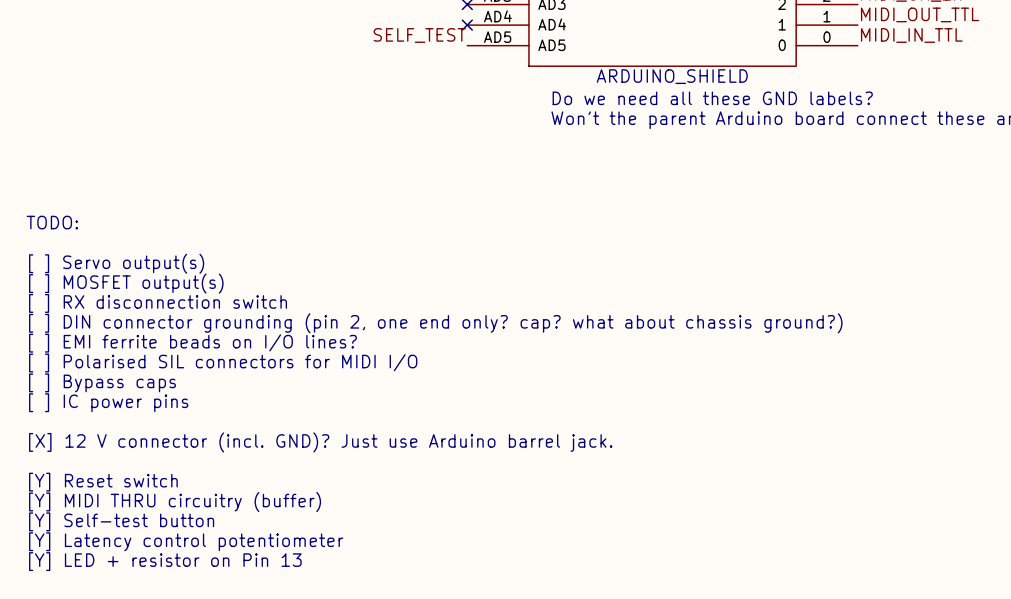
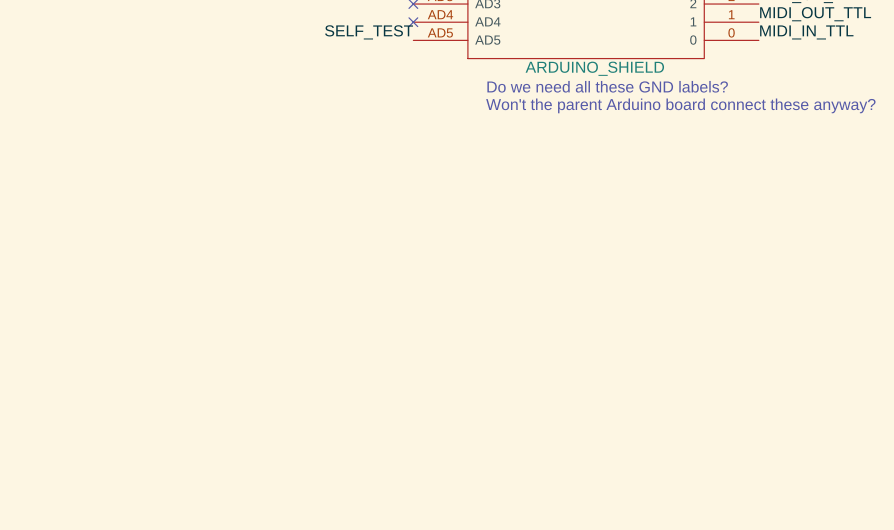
text: TODO: (52, 222) -> none
text: [ ] Servo output(s) (116, 263) -> none
text: [ ] MOSFET output(s) (126, 283) -> none
text: [ ] RX disconnection switch (158, 303) -> none
text: [ ] DIN connector grounding (pin 2, one end only? cap? what about chassis ground?) (435, 323) -> none
text: [ ] EMI ferrite beads on I/O lines? (192, 343) -> none
text: [ ] Polarised SIL connectors for MIDI I/O (223, 363) -> none
text: [ ] Bypass caps (102, 382) -> none
text: [ ] IC power pins (108, 402) -> none
text: [X] 12 V connector (incl. GND)? Just use Arduino barrel jack. (320, 442) -> none
text: [Y] Reset switch (103, 482) -> none
text: [Y] MIDI THRU circuitry (buffer) (175, 502) -> none
text: [Y] Self-test button (121, 521) -> none
text: [Y] Latency control potentiometer (186, 541) -> none
text: [Y] LED + resistor on Pin 13 (165, 561) -> none

